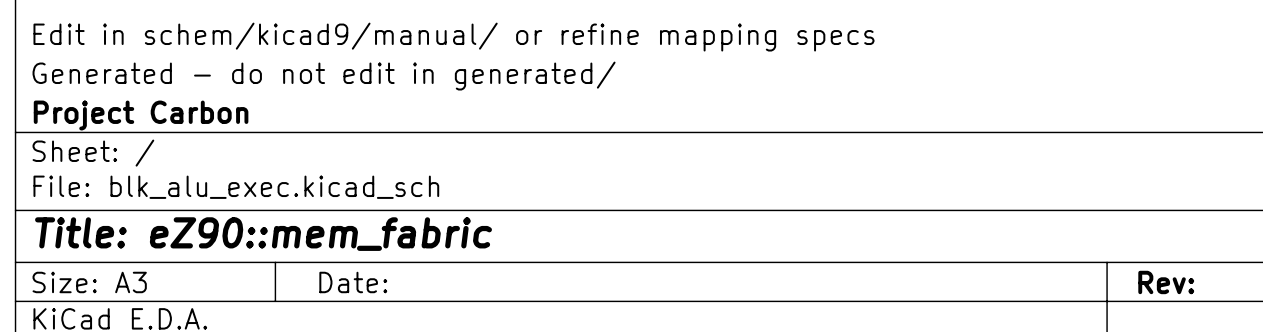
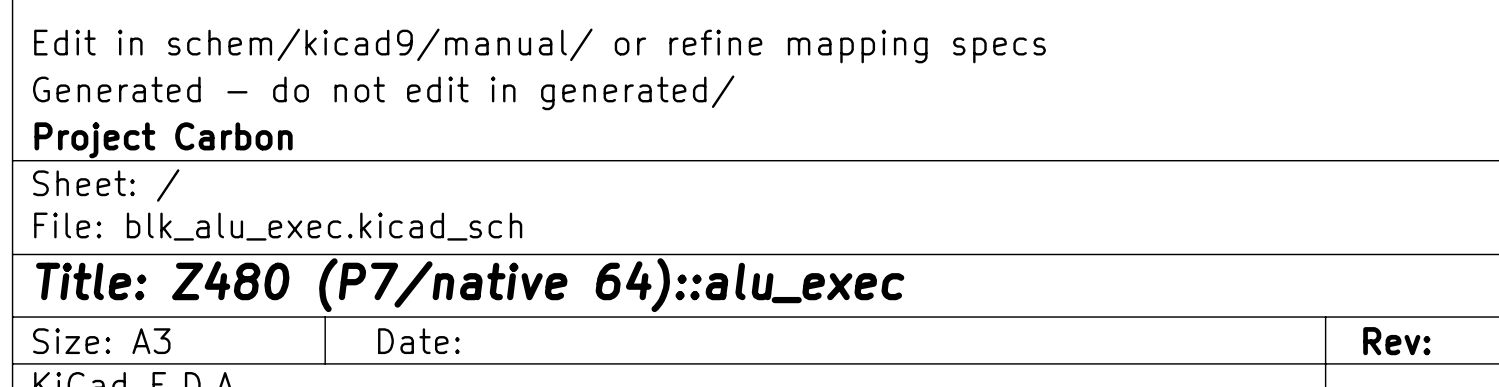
title block: Title: eZ90::mem_fabric (263, 234) -> Title: Z480 (P7/native 64)::alu_exec (470, 285)

